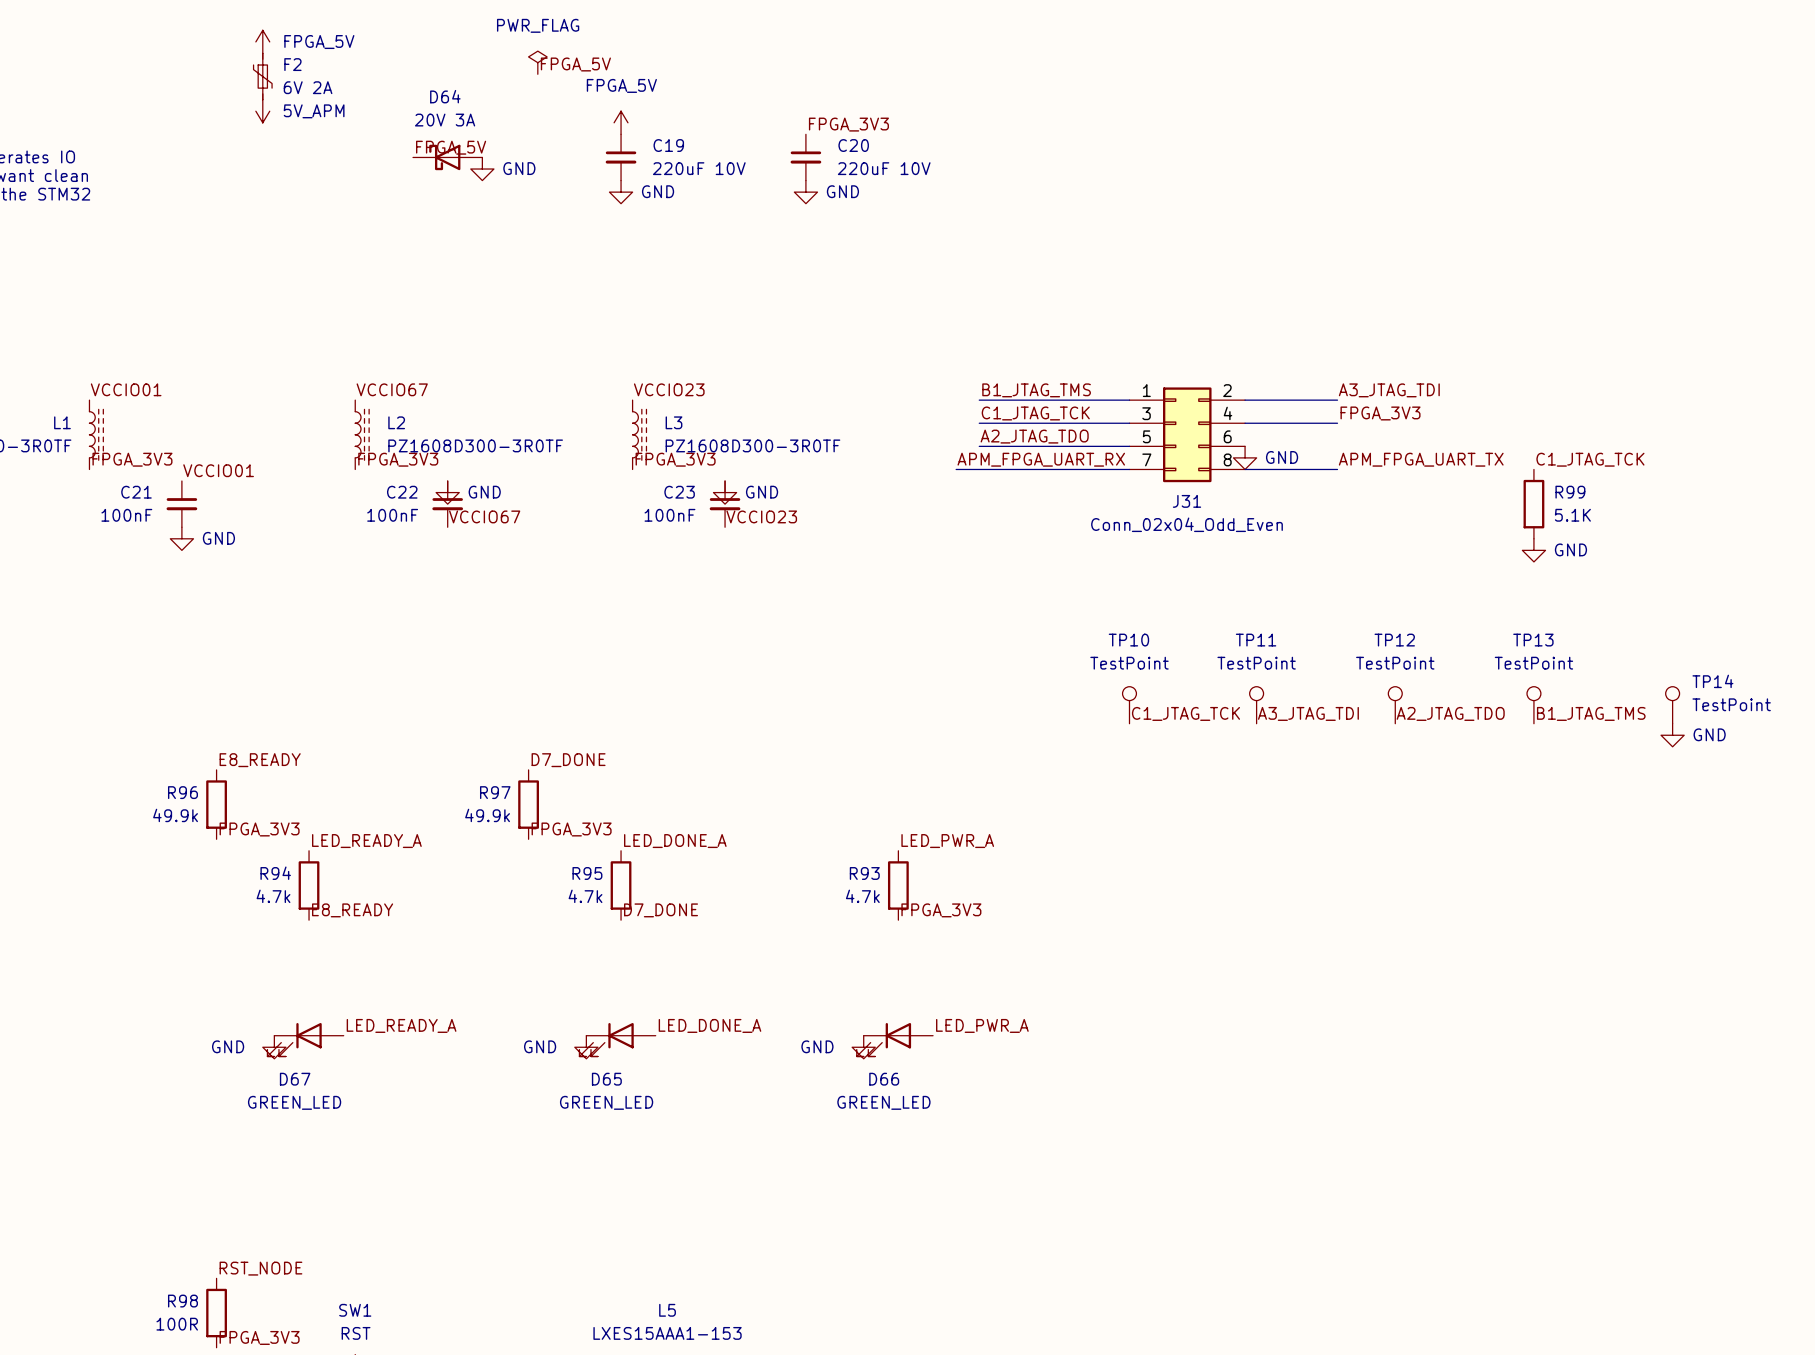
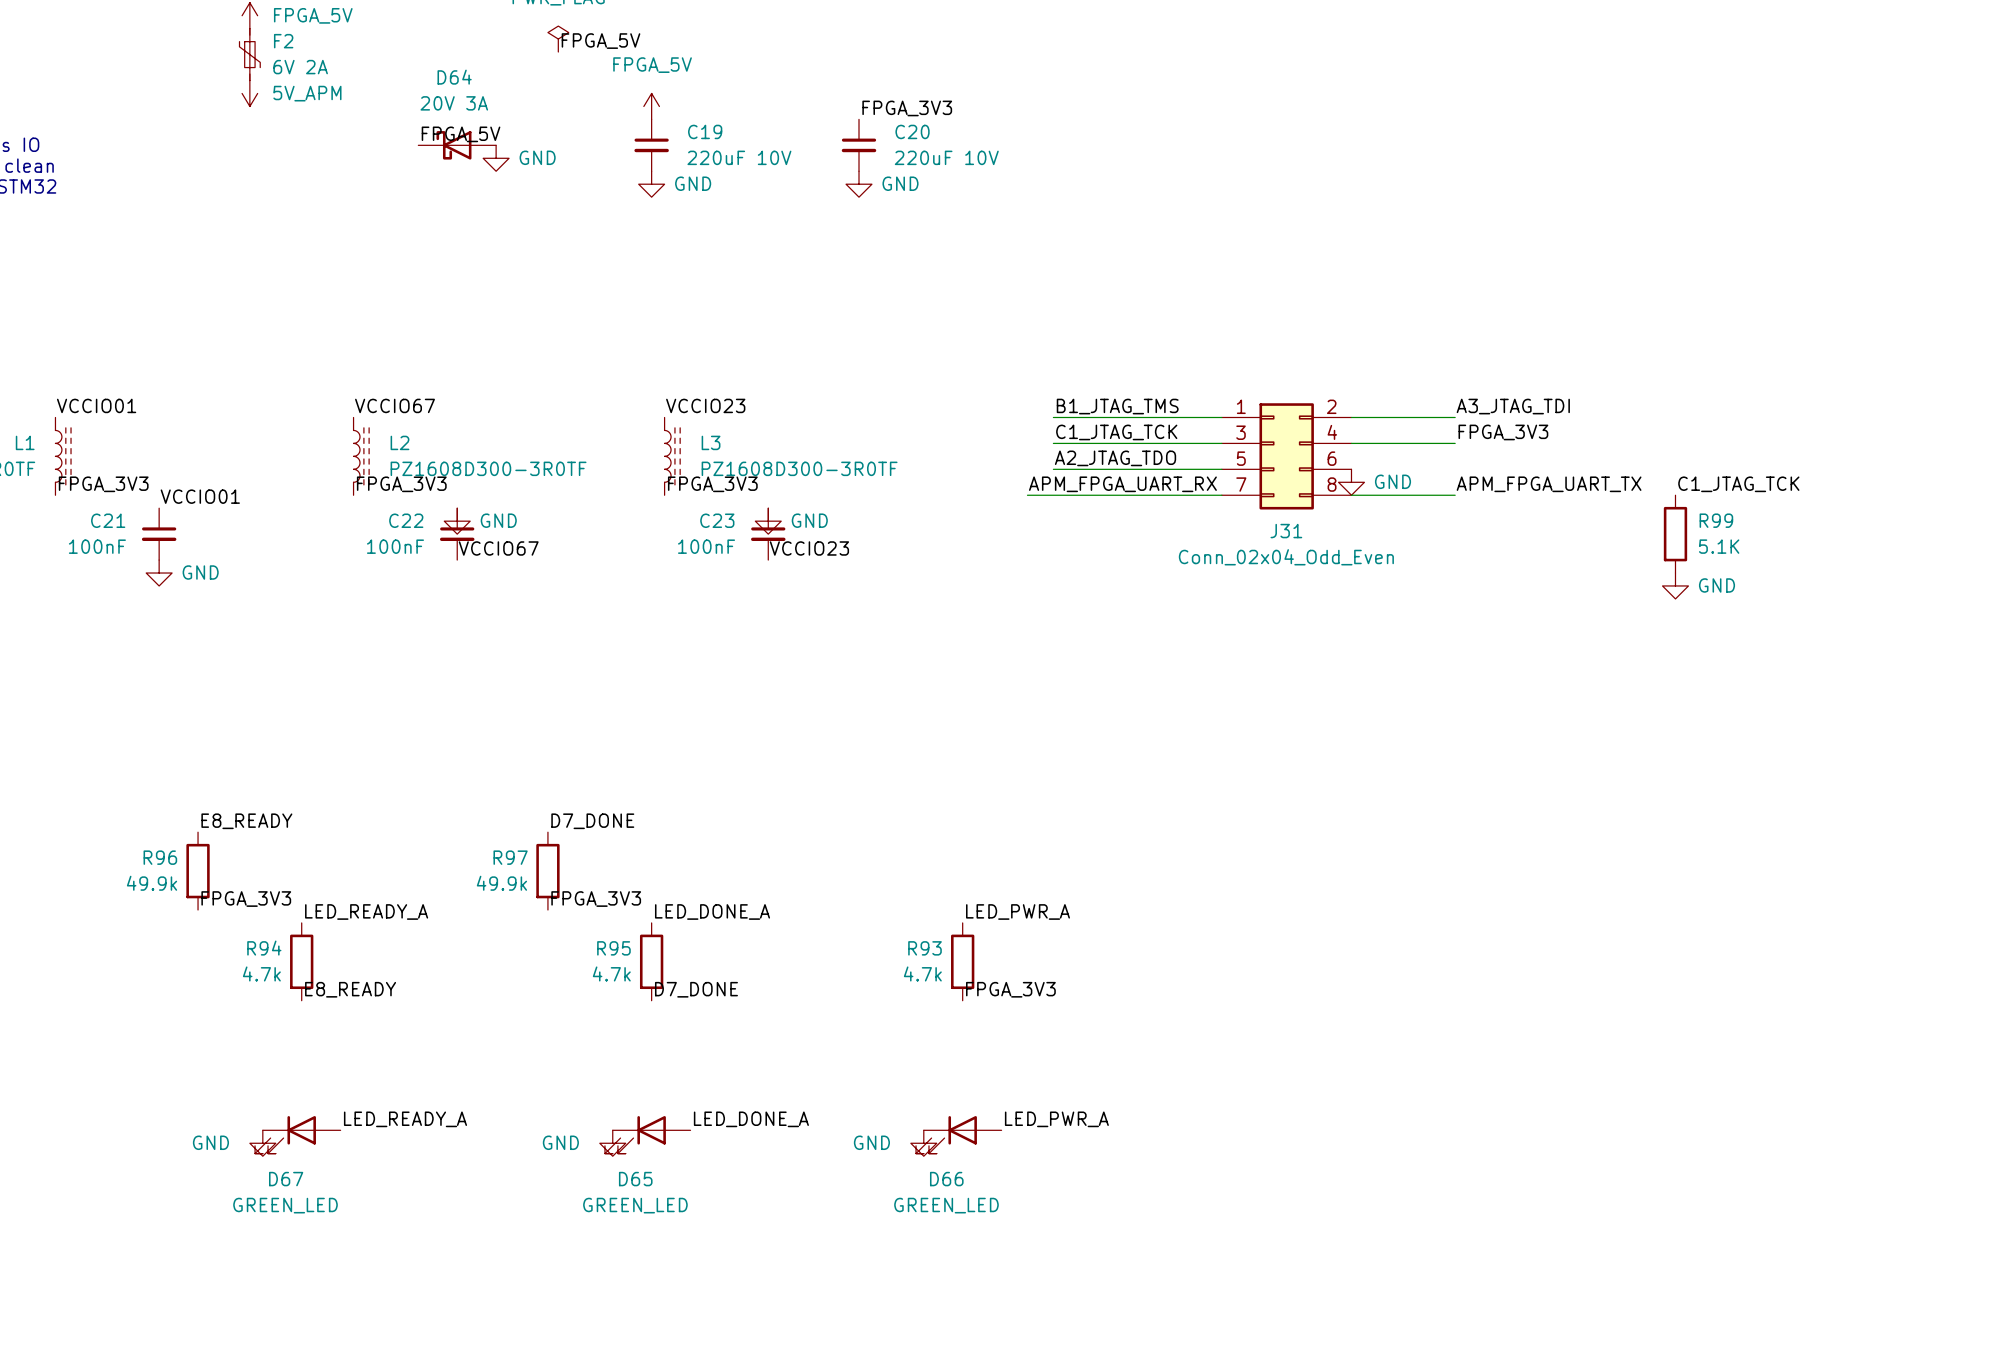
TP10: TestPoint (1129, 705) -> none
TP11: TestPoint (1256, 705) -> none
TP12: TestPoint (1395, 705) -> none
TP13: TestPoint (1533, 705) -> none
TP14: TestPoint (1672, 705) -> none
label: C1_JTAG_TCK (1185, 713) -> none
label: A3_JTAG_TDI (1308, 713) -> none
label: A2_JTAG_TDO (1450, 713) -> none
label: B1_JTAG_TMS (1591, 713) -> none
power symbol: GND (1672, 735) -> none

